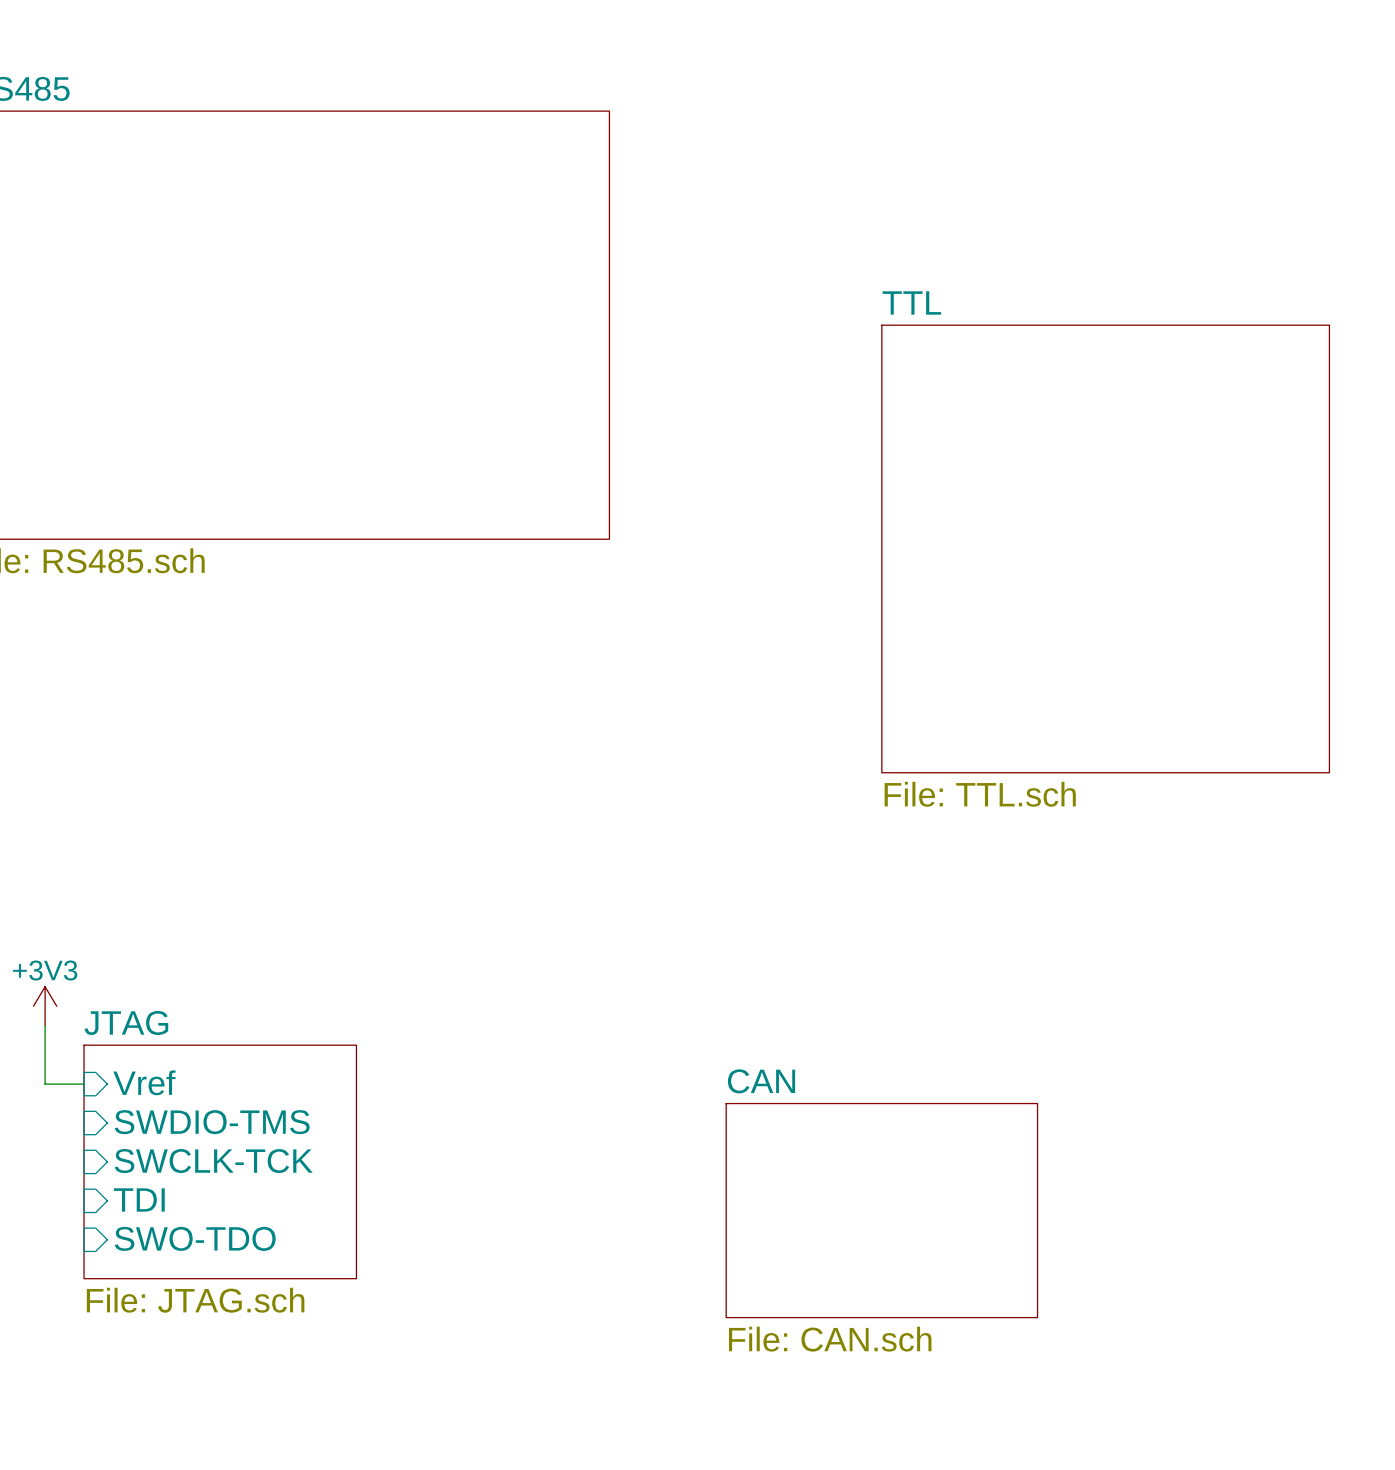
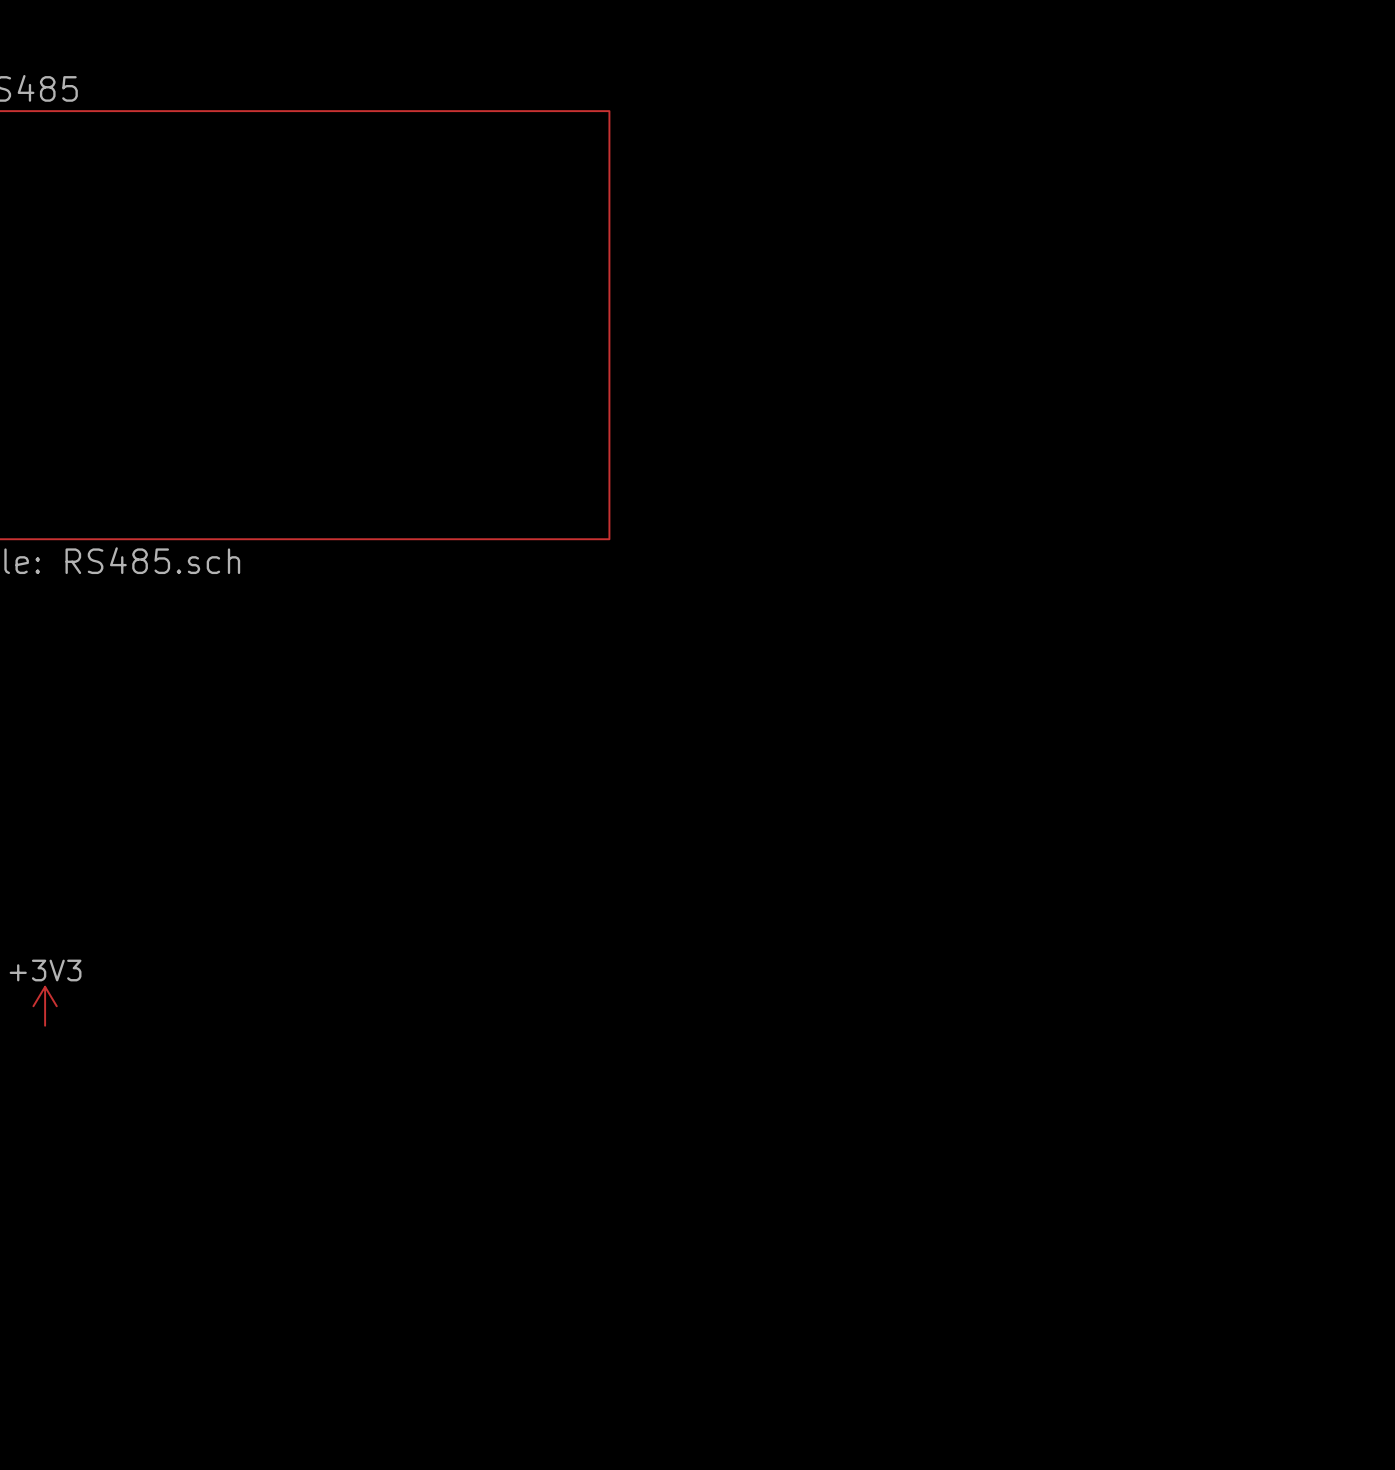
sheet TTL: File: TTL.sch (1105, 548) -> none
wire: (45, 1025) (45, 1084) (84, 1084) -> none
sheet pin: Vref (144, 1082) -> none
sheet pin: SWDIO-TMS (212, 1122) -> none
sheet pin: SWCLK-TCK (213, 1161) -> none
sheet JTAG: File: JTAG.sch (220, 1161) -> none
sheet pin: TDI (139, 1199) -> none
sheet CAN: File: CAN.sch (881, 1210) -> none
sheet pin: SWO-TDO (195, 1238) -> none

